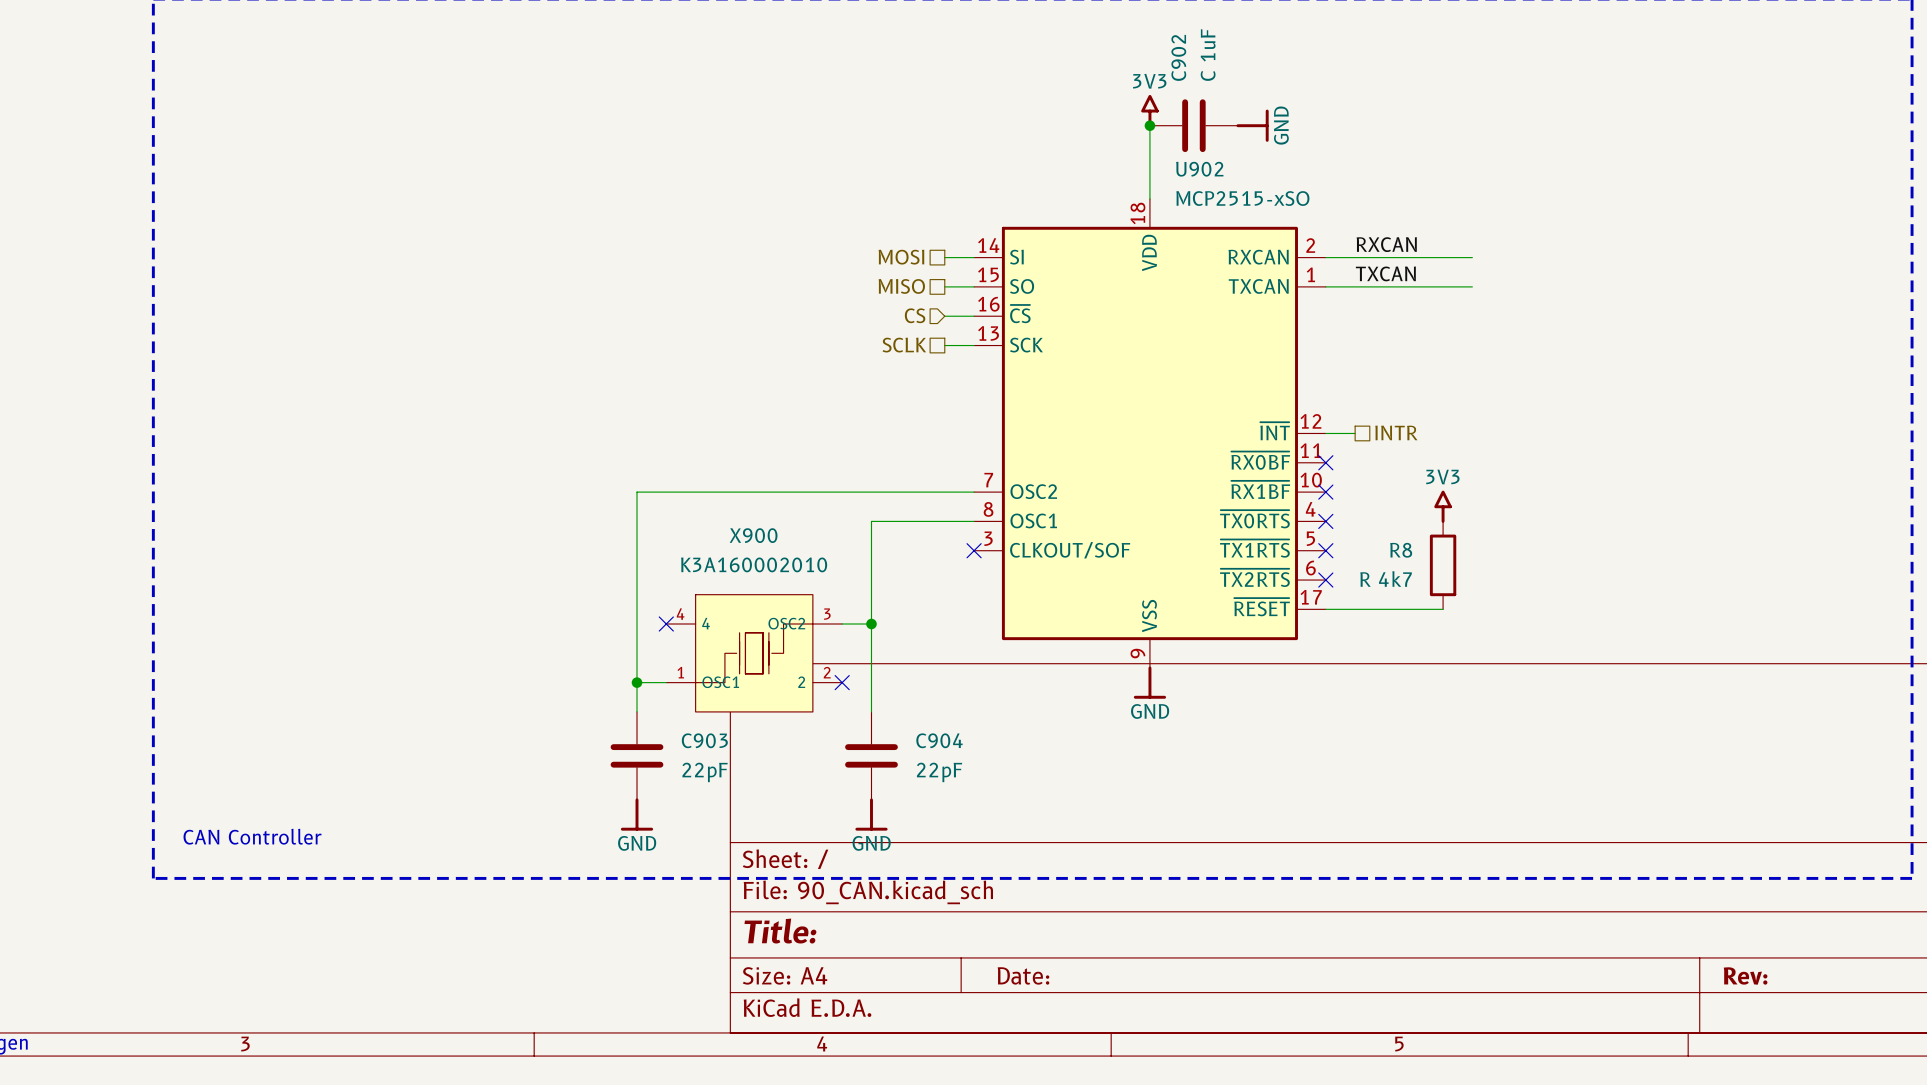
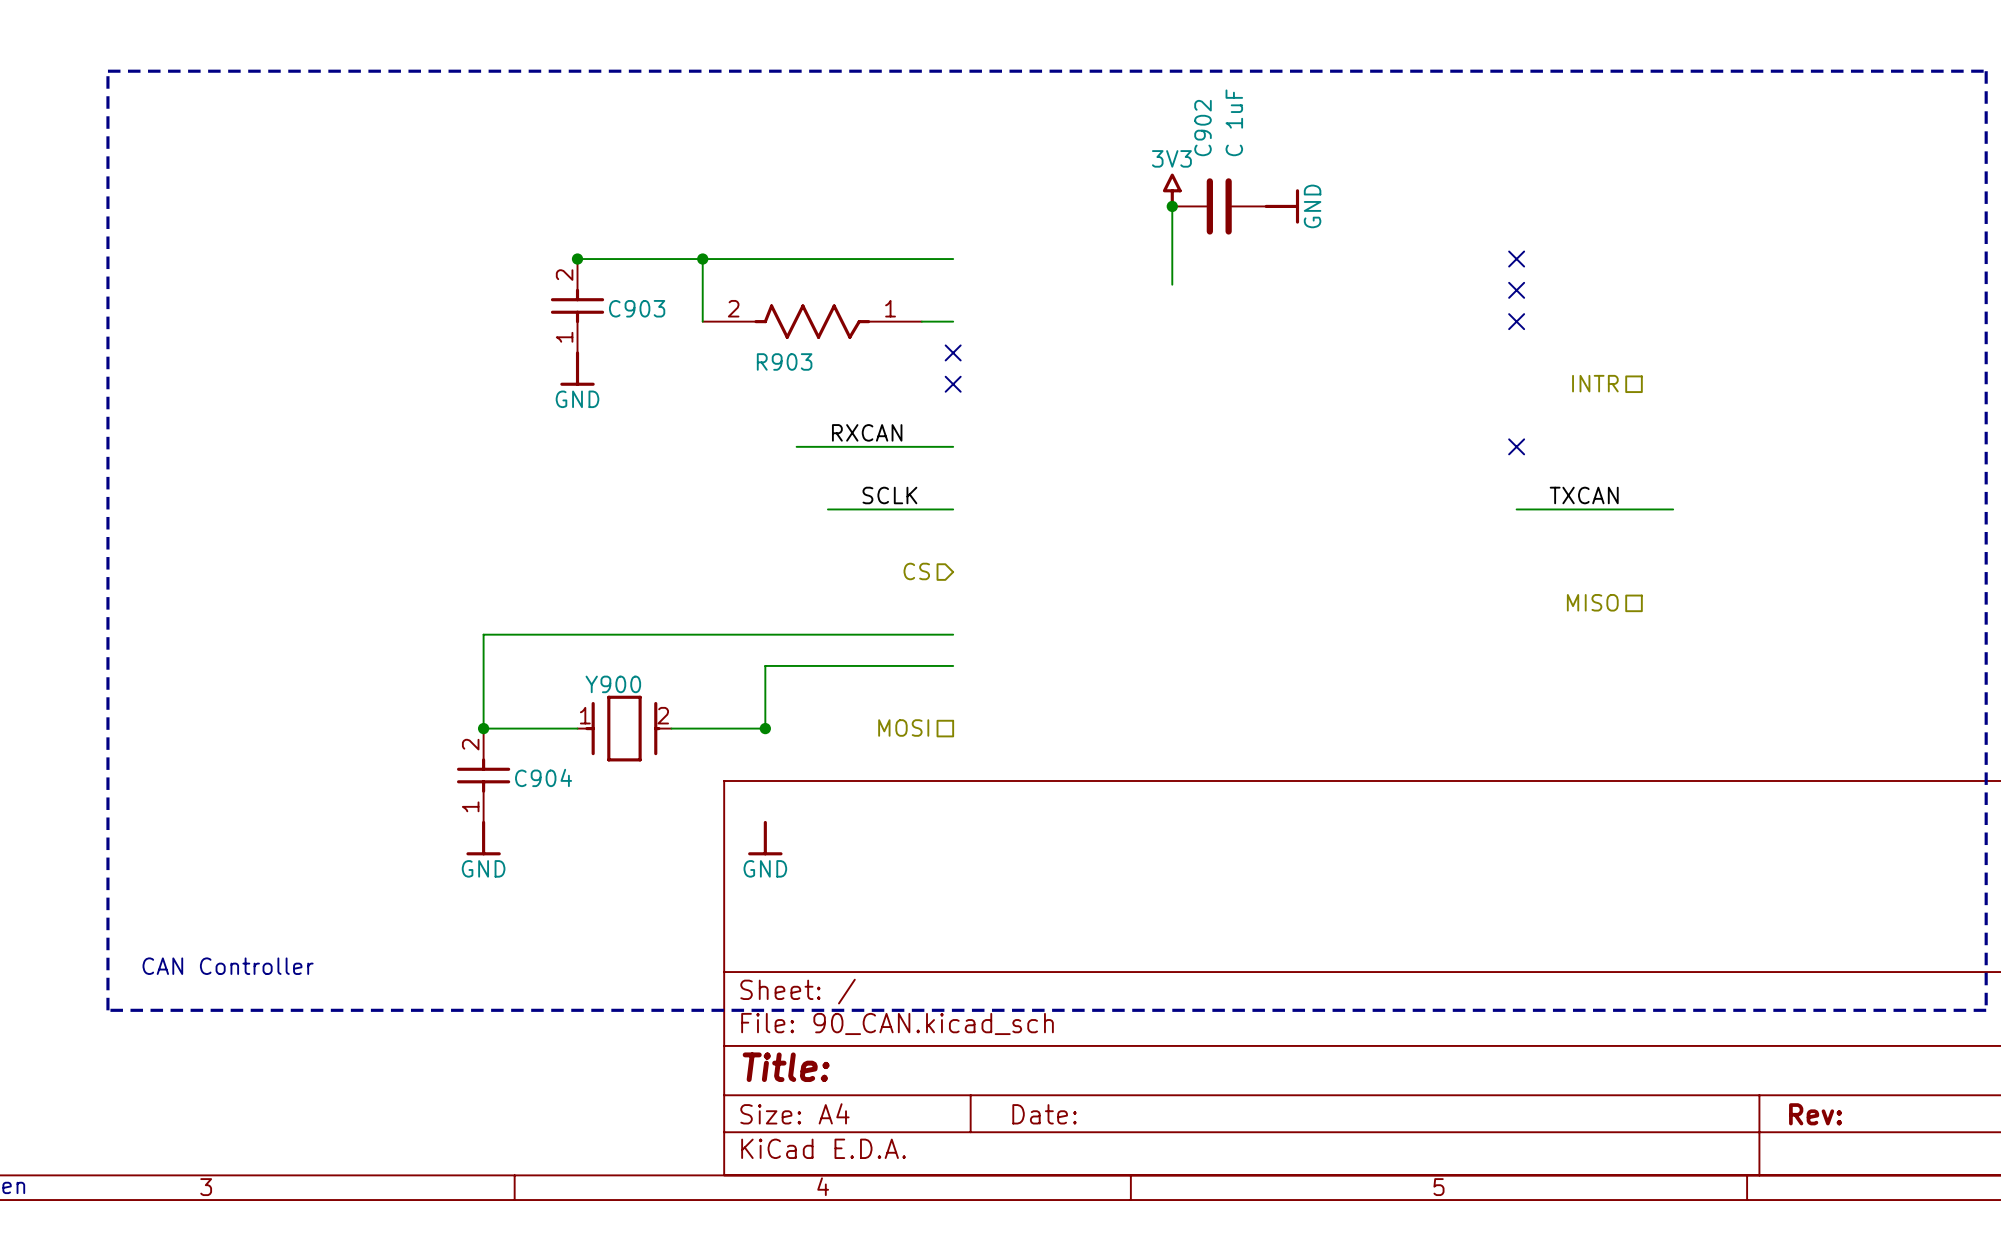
wire: none -> (577, 259) (953, 259)
junction: none -> (577, 259)
wire: none -> (702, 259) (702, 321)
junction: none -> (702, 259)
no-connect mark: none -> (1516, 259)
no-connect mark: none -> (1516, 290)
R903: none -> (812, 321)
no-connect mark: none -> (1516, 321)
label: RXCAN (1386, 244) -> none
hierarchical label: MOSI (901, 257) -> none
wire: (944, 257) (974, 257) -> (921, 321) (953, 321)
wire: (1325, 257) (1472, 257) -> none
no-connect mark: none -> (953, 352)
label position: TXCAN (1385, 273) -> TXCAN (1584, 495)
power symbol: none -> GND (577, 368)
hierarchical label: MISO (901, 286) -> none
wire: (944, 286) (974, 286) -> none
wire: (1325, 286) (1472, 286) -> (1516, 509) (1673, 509)
no-connect mark: none -> (953, 384)
hierarchical label position: CS (915, 315) -> CS (916, 571)
wire: (944, 316) (974, 316) -> none
label: none -> RXCAN (867, 432)
hierarchical label: SCLK (904, 345) -> none
wire: (944, 345) (974, 345) -> none
wire: none -> (796, 446) (953, 446)
no-connect mark: none -> (1516, 446)
label: none -> SCLK (889, 495)
wire: none -> (827, 509) (953, 509)
hierarchical label rotation: 0° (1396, 432) -> 180° (1595, 383)
hierarchical label position: INTR (1396, 432) -> INTR (1595, 383)
U902: MCP2515-xSO (1149, 433) -> none
wire: (1325, 433) (1355, 433) -> none
no-connect mark: (1325, 462) -> none
wire: (974, 492) (637, 492) (637, 711) -> none
no-connect mark: (1325, 492) -> none
hierarchical label: none -> MISO (1592, 602)
power symbol: 3V3 (1443, 506) -> none
wire: (974, 521) (871, 521) (871, 711) -> none
no-connect mark: (1325, 521) -> none
wire: none -> (953, 634) (483, 634) (483, 728) (577, 728)
no-connect mark: (974, 550) -> none
no-connect mark: (1325, 550) -> none
wire: none -> (953, 665) (765, 665) (765, 728) (671, 728)
R8: R 4k7 (1443, 565) -> none
no-connect mark: (1325, 580) -> none
wire: (1325, 609) (1443, 609) -> none
junction: none -> (483, 728)
Y900: none -> (624, 728)
junction: none -> (765, 728)
hierarchical label: none -> MOSI (903, 728)
no-connect mark: (666, 624) -> none
wire: (842, 624) (871, 624) -> none
junction: (871, 624) -> none
X900: K3A160002010 (754, 653) -> none
wire: (637, 682) (666, 682) -> none
junction: (637, 682) -> none
no-connect mark: (842, 682) -> none
power symbol: GND (1149, 682) -> none
C903 symbol: [610, 711, 664, 800] -> [550, 259, 605, 353]
C904 symbol: [845, 711, 898, 800] -> [456, 728, 511, 823]
power symbol: none -> GND (483, 838)
power symbol: none -> GND (765, 838)
C903 name position: C903 (704, 740) -> C903 (637, 308)
C904 name position: C904 (939, 740) -> C904 (543, 777)
C903 value: 22pF (705, 772) -> none
C904 value: 22pF (939, 772) -> none
power symbol: GND (637, 814) -> none
power symbol: GND (871, 814) -> none

